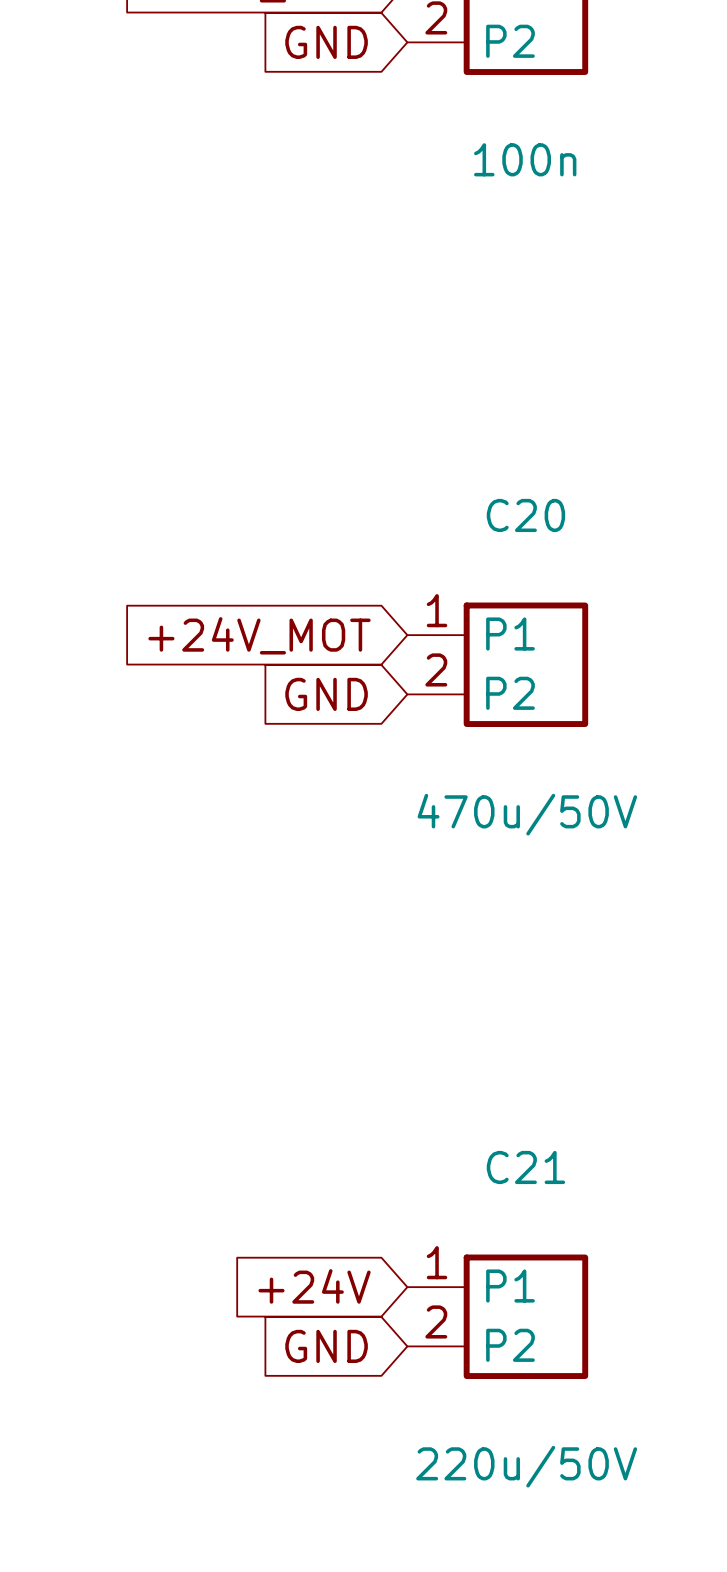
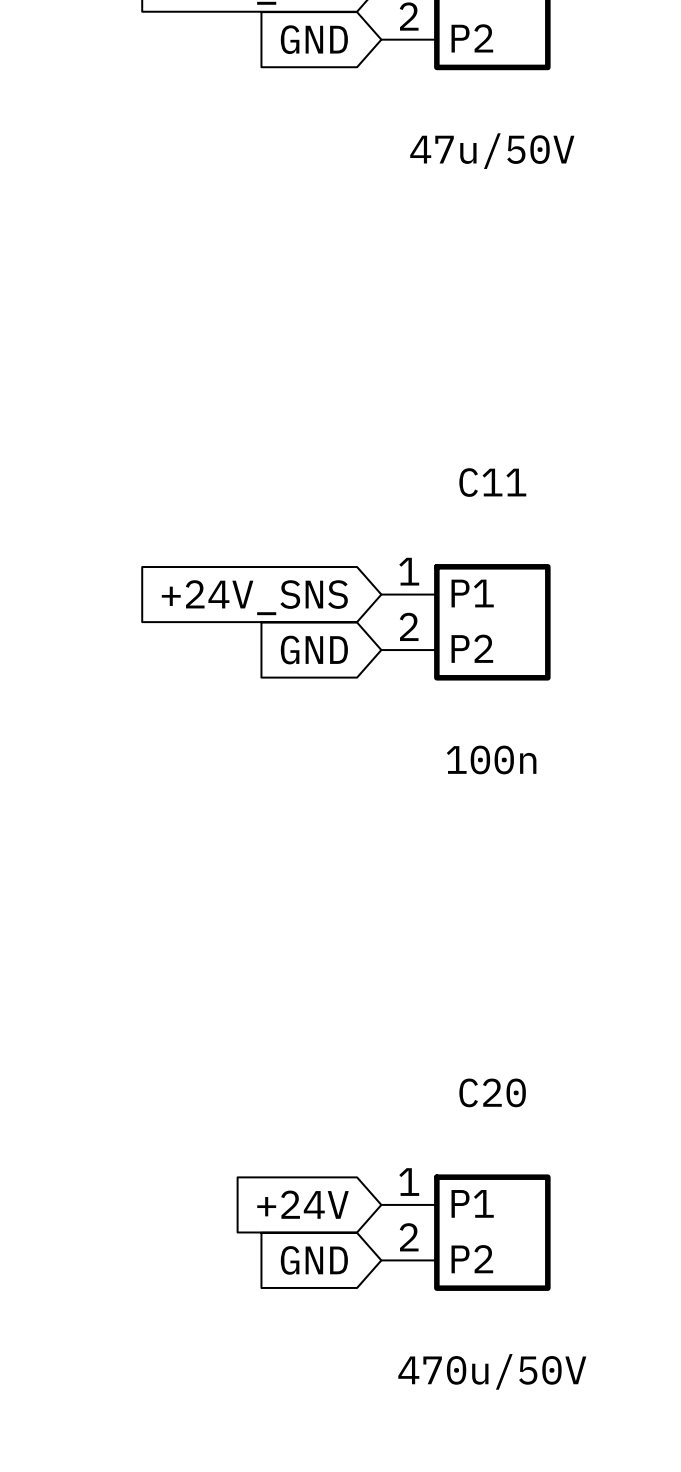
part value: 100n (525, 159) -> 47u/50V (492, 151)
C20 name: C20 (525, 515) -> C11 (492, 482)
global label: +24V_MOT (259, 635) -> +24V_SNS (254, 597)
C20 value: 470u/50V (527, 814) -> 100n (491, 759)
C21 name: C21 (525, 1167) -> C20 (492, 1092)
C21 value: 220u/50V (526, 1466) -> 470u/50V (492, 1371)

